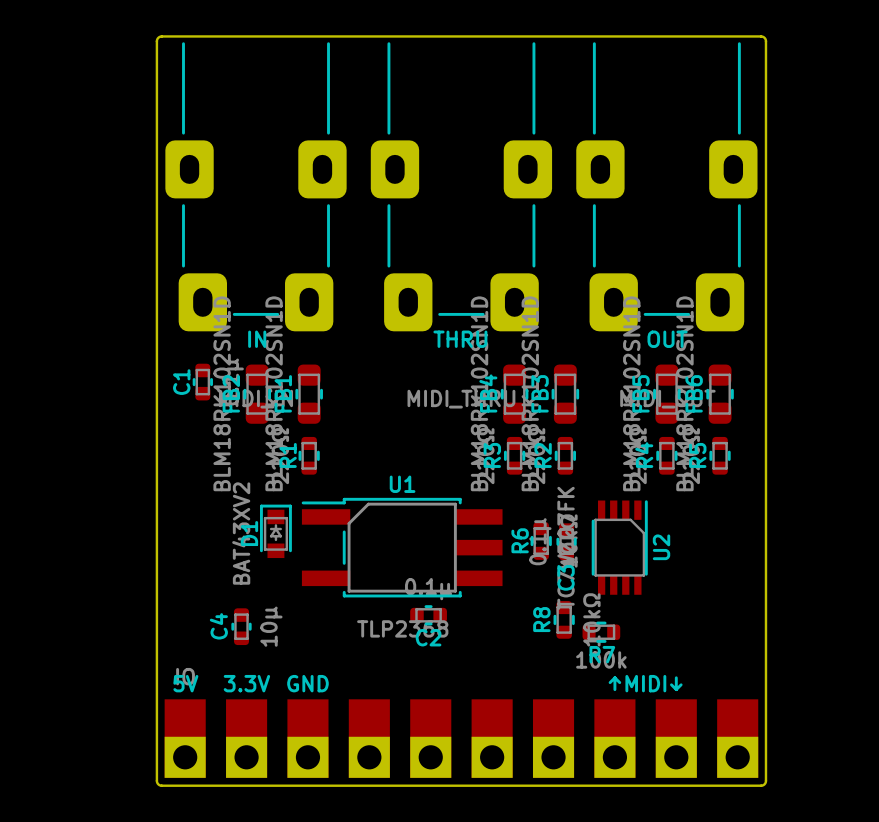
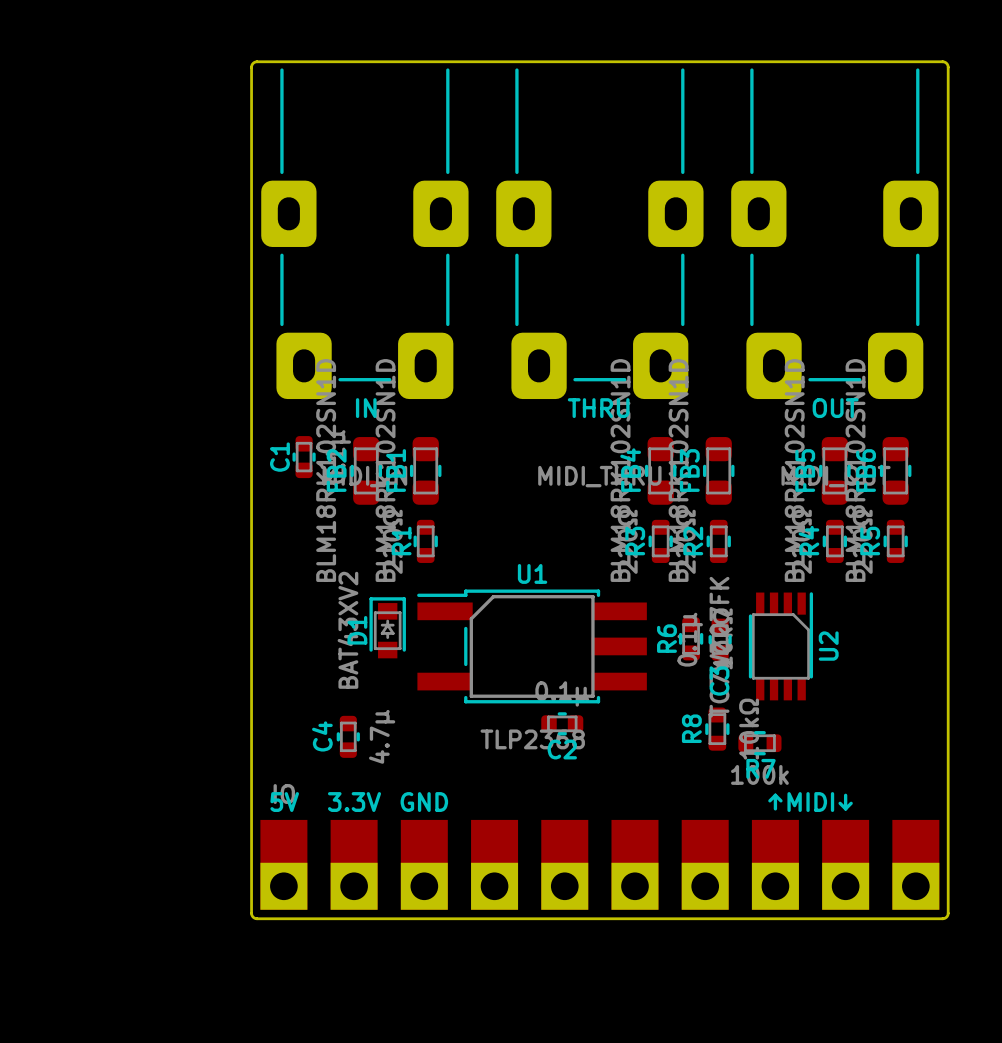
C4 value: 10μ (271, 626) -> 4.7μ (382, 736)

